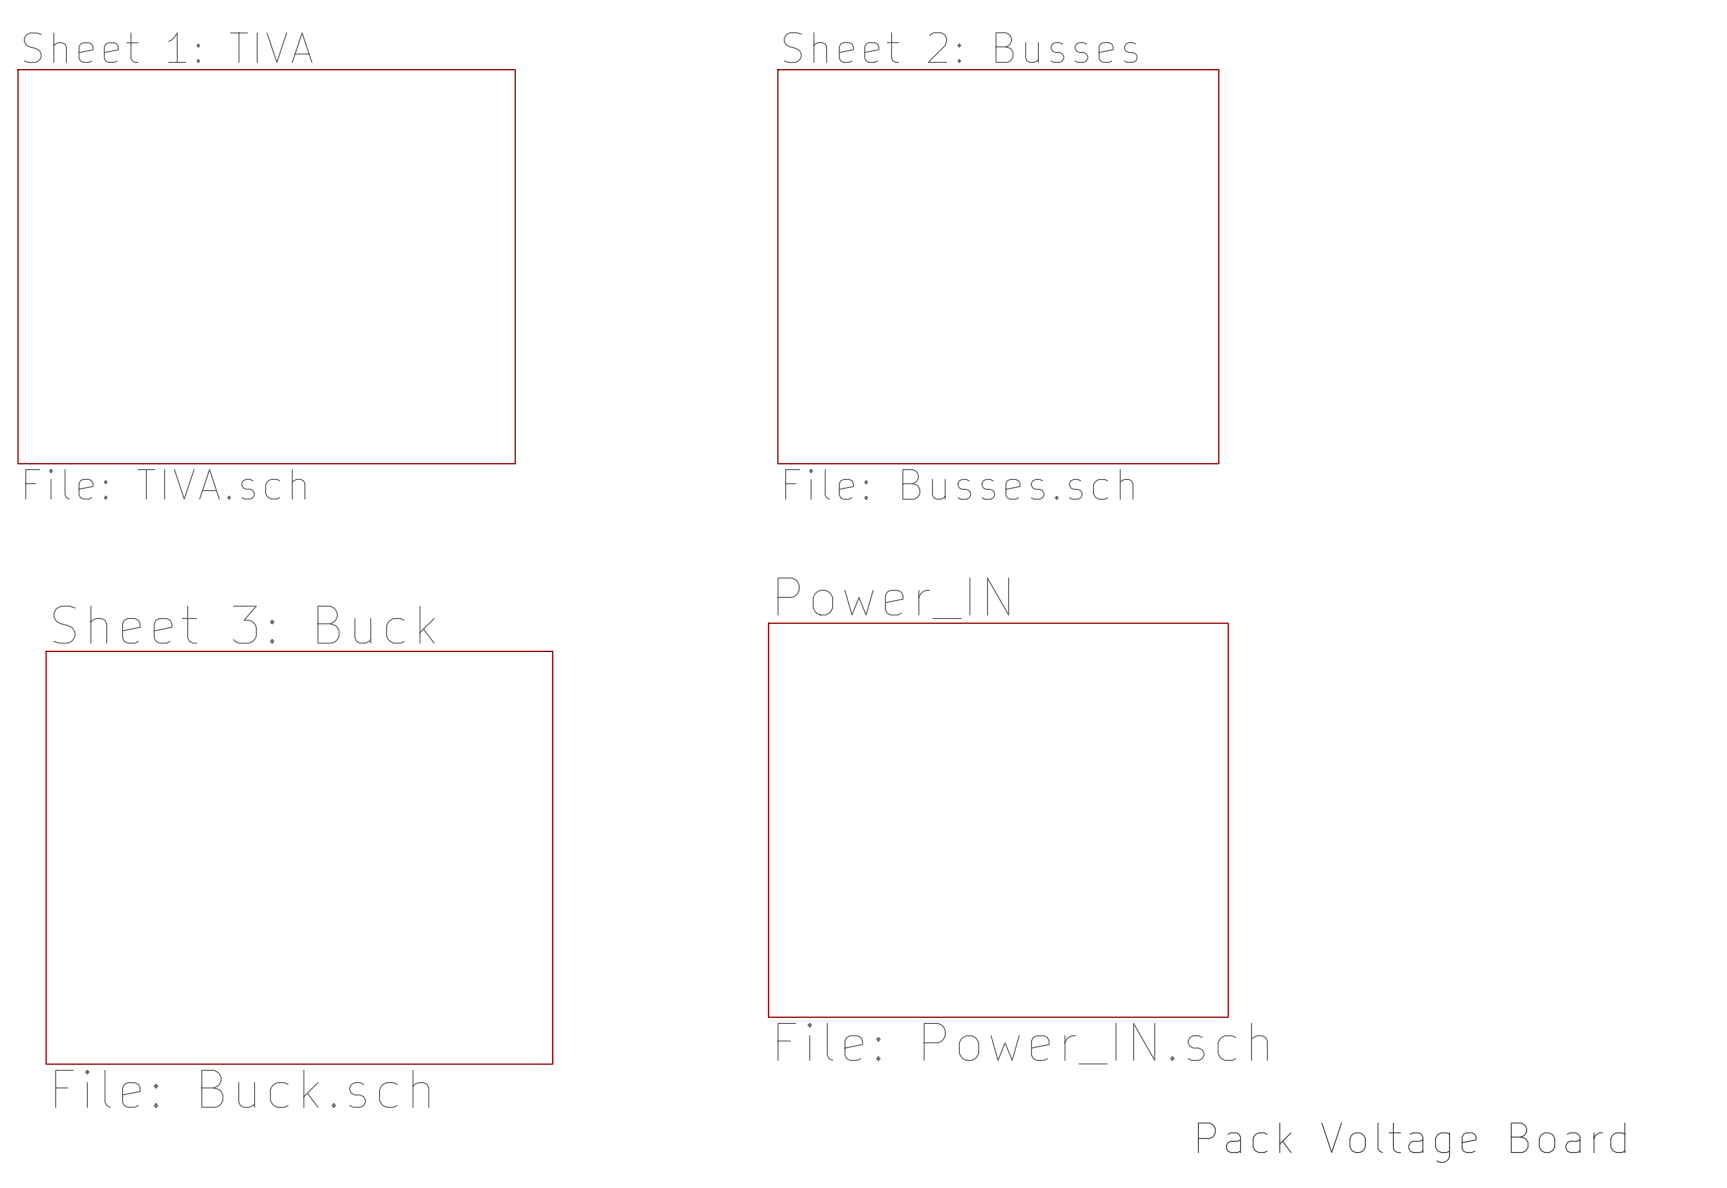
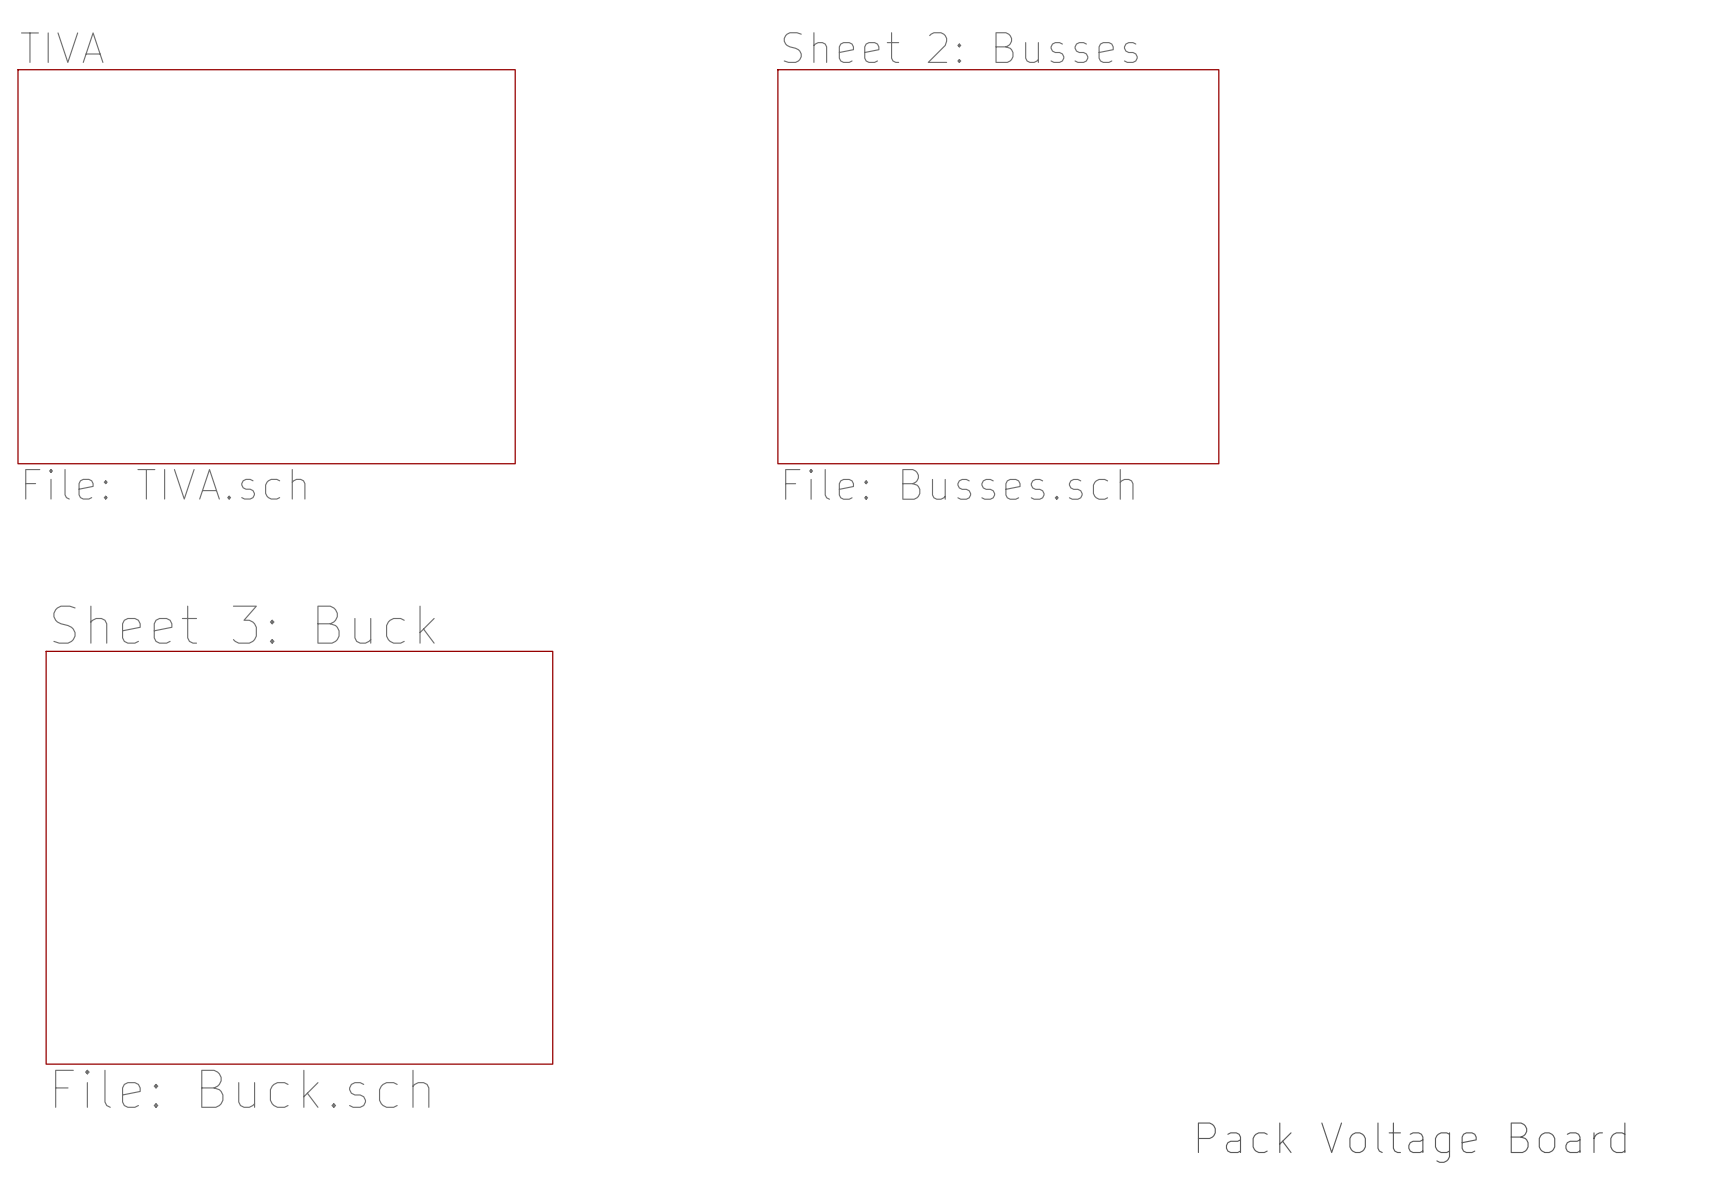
sheet TIVA name: Sheet 1: TIVA (168, 47) -> TIVA (62, 47)
sheet Power_IN: File: Power_IN.sch (998, 820) -> none

